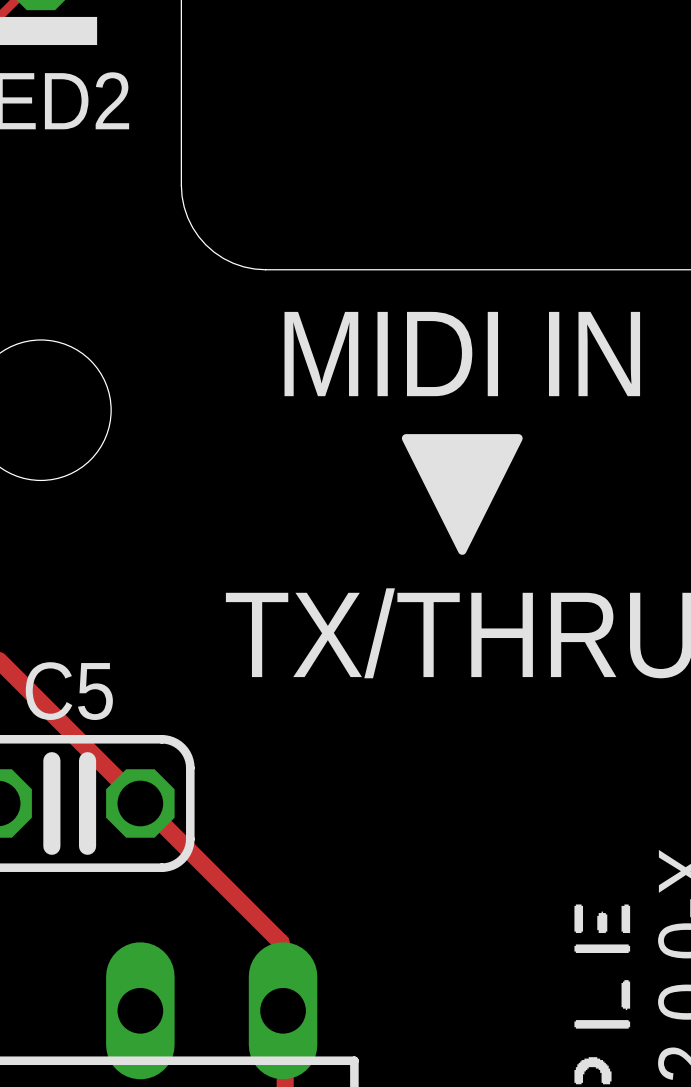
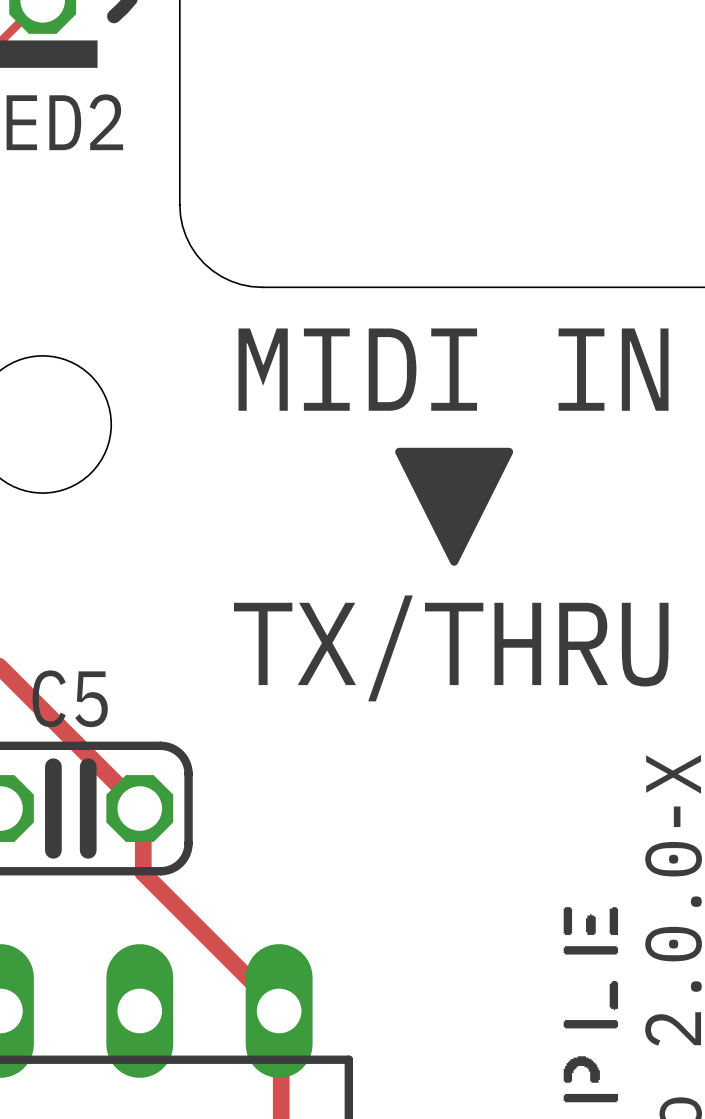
track: (143, 805) (280, 942) (280, 1006) -> (143, 810) (143, 873) (277, 1006)

